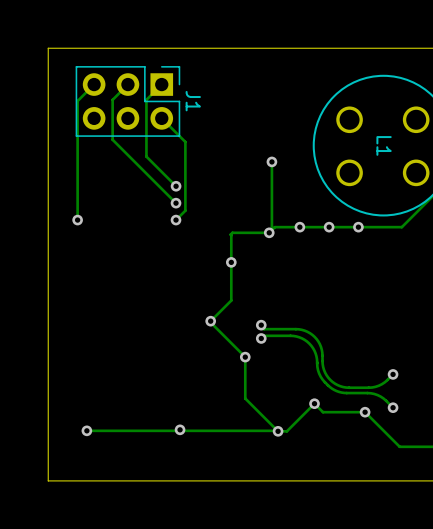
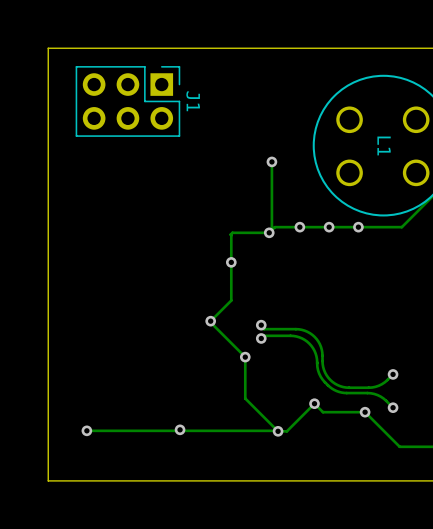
track: (94, 84) (77, 101) (77, 220) -> none
track: (127, 84) (112, 99) (112, 139) (176, 203) -> none
track: (161, 84) (146, 99) (146, 156) (176, 186) -> none
track: (161, 118) (185, 141) (185, 210) (176, 220) -> none
via: (176, 186) -> none
via: (176, 203) -> none
via: (77, 220) -> none
via: (176, 220) -> none

